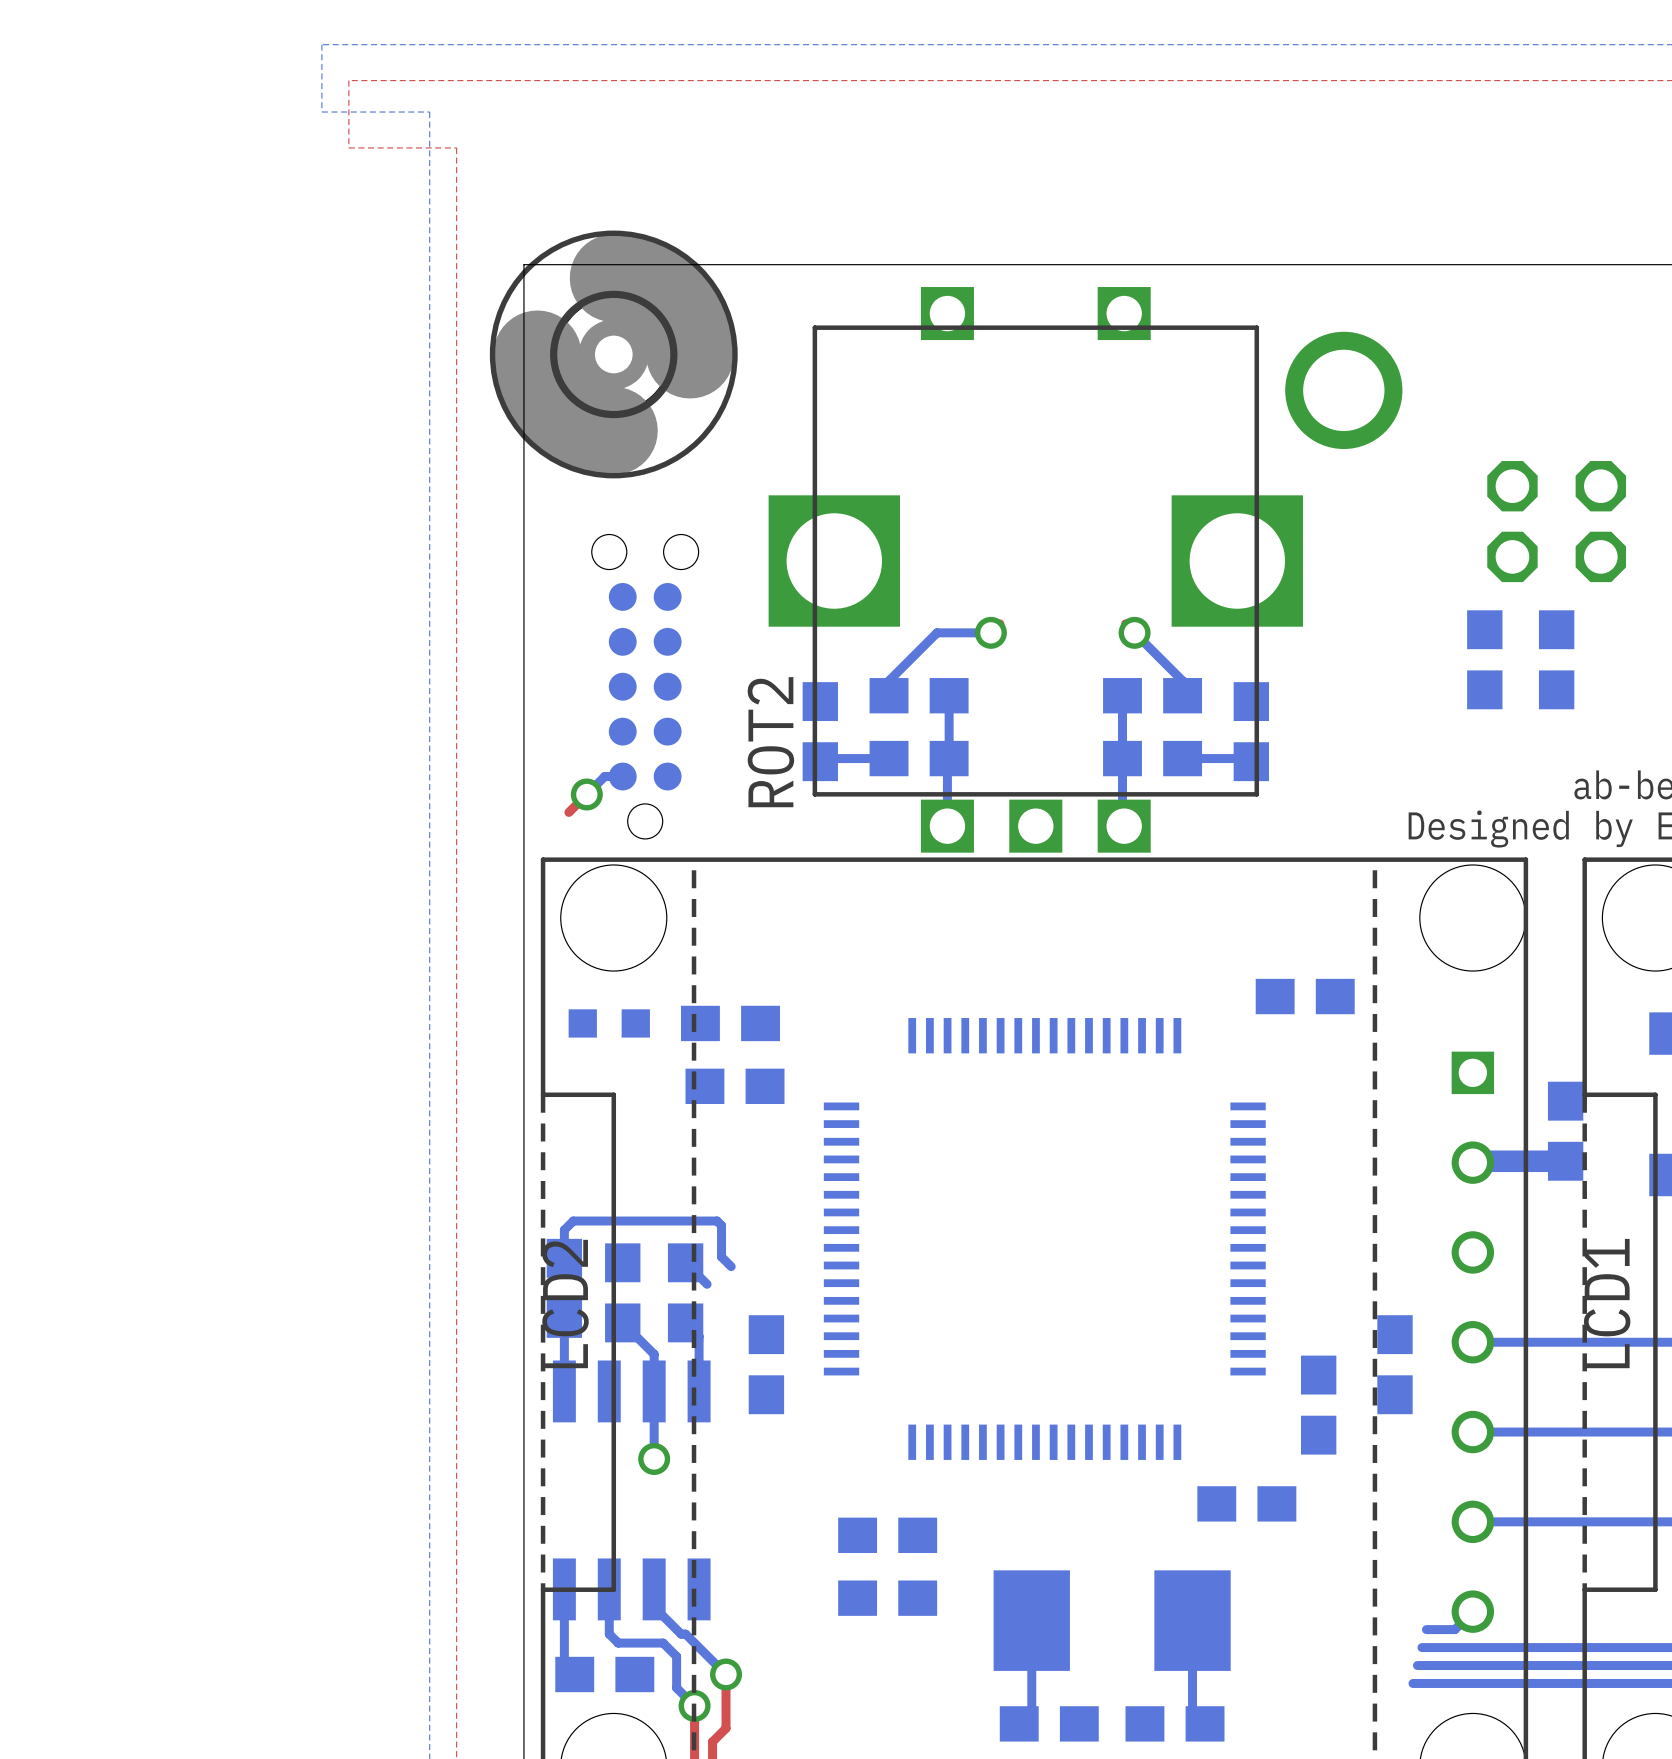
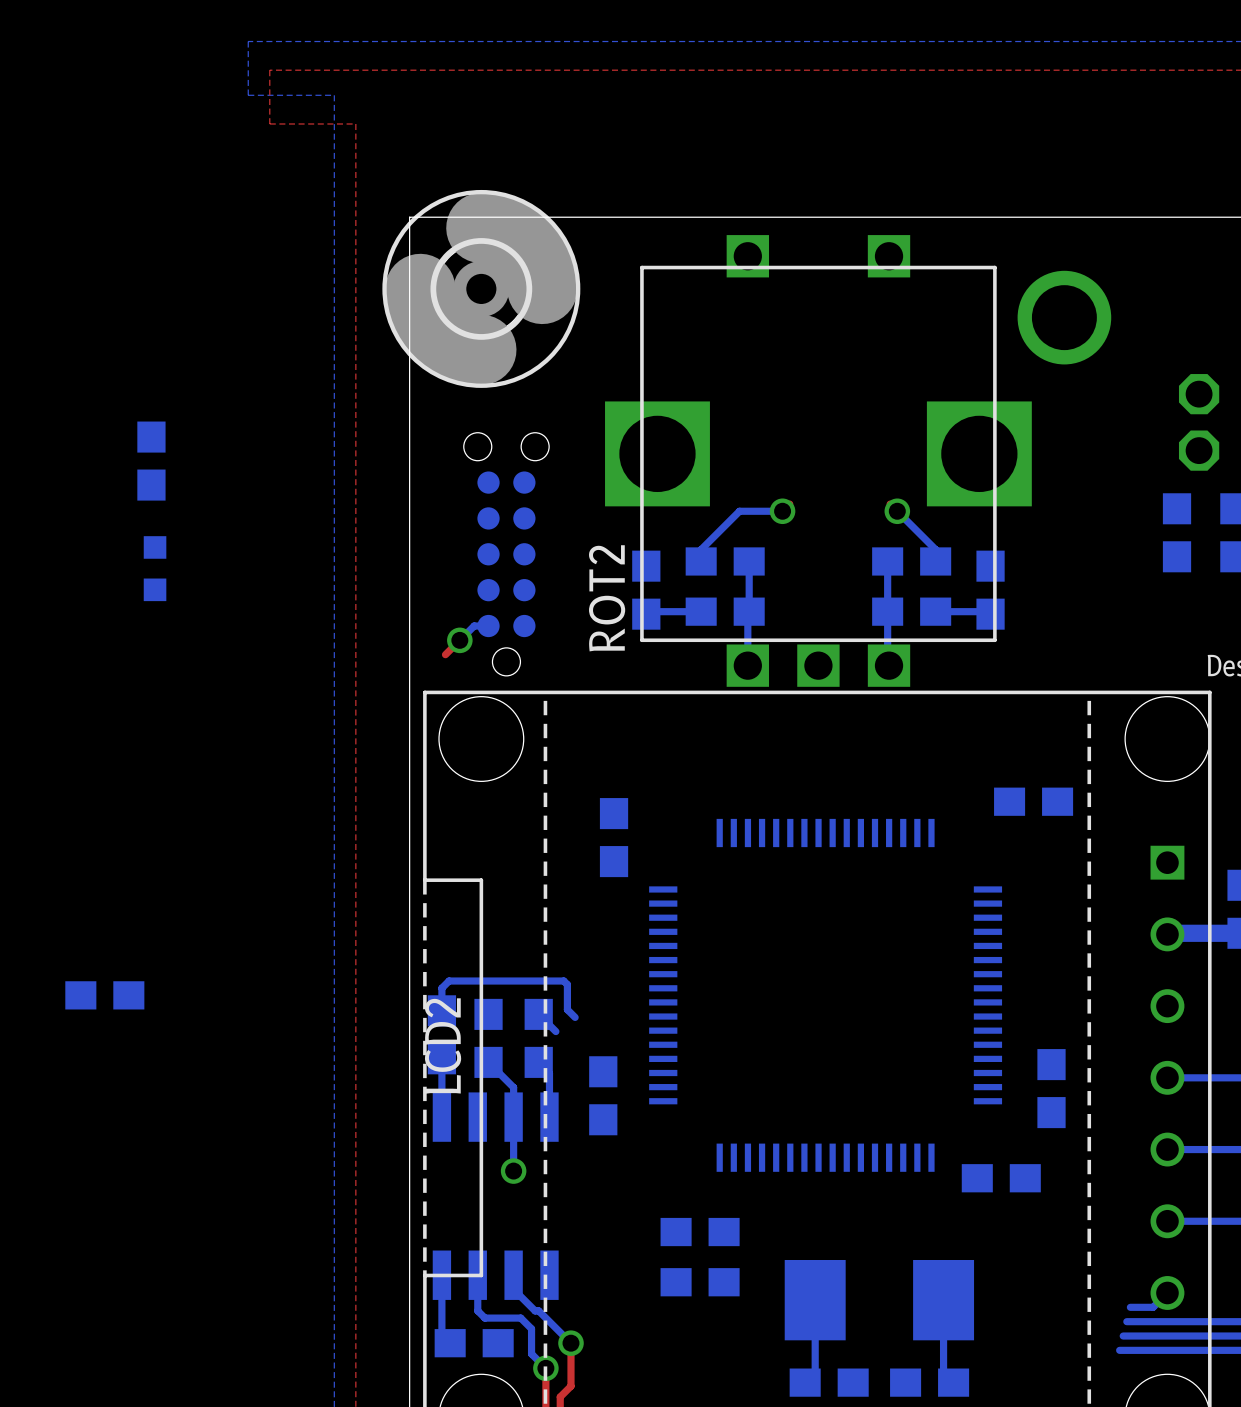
part: none -> (151, 461)
part: none -> (155, 568)
part: (609, 1023) -> none
part: (730, 1023) -> none
part: none -> (614, 837)
part: (734, 1086) -> none
part: none -> (104, 995)
part: none -> (1051, 1088)
part: (1395, 1364) -> none
part: (1318, 1405) -> none
part position: (1246, 1503) -> (1001, 1178)

